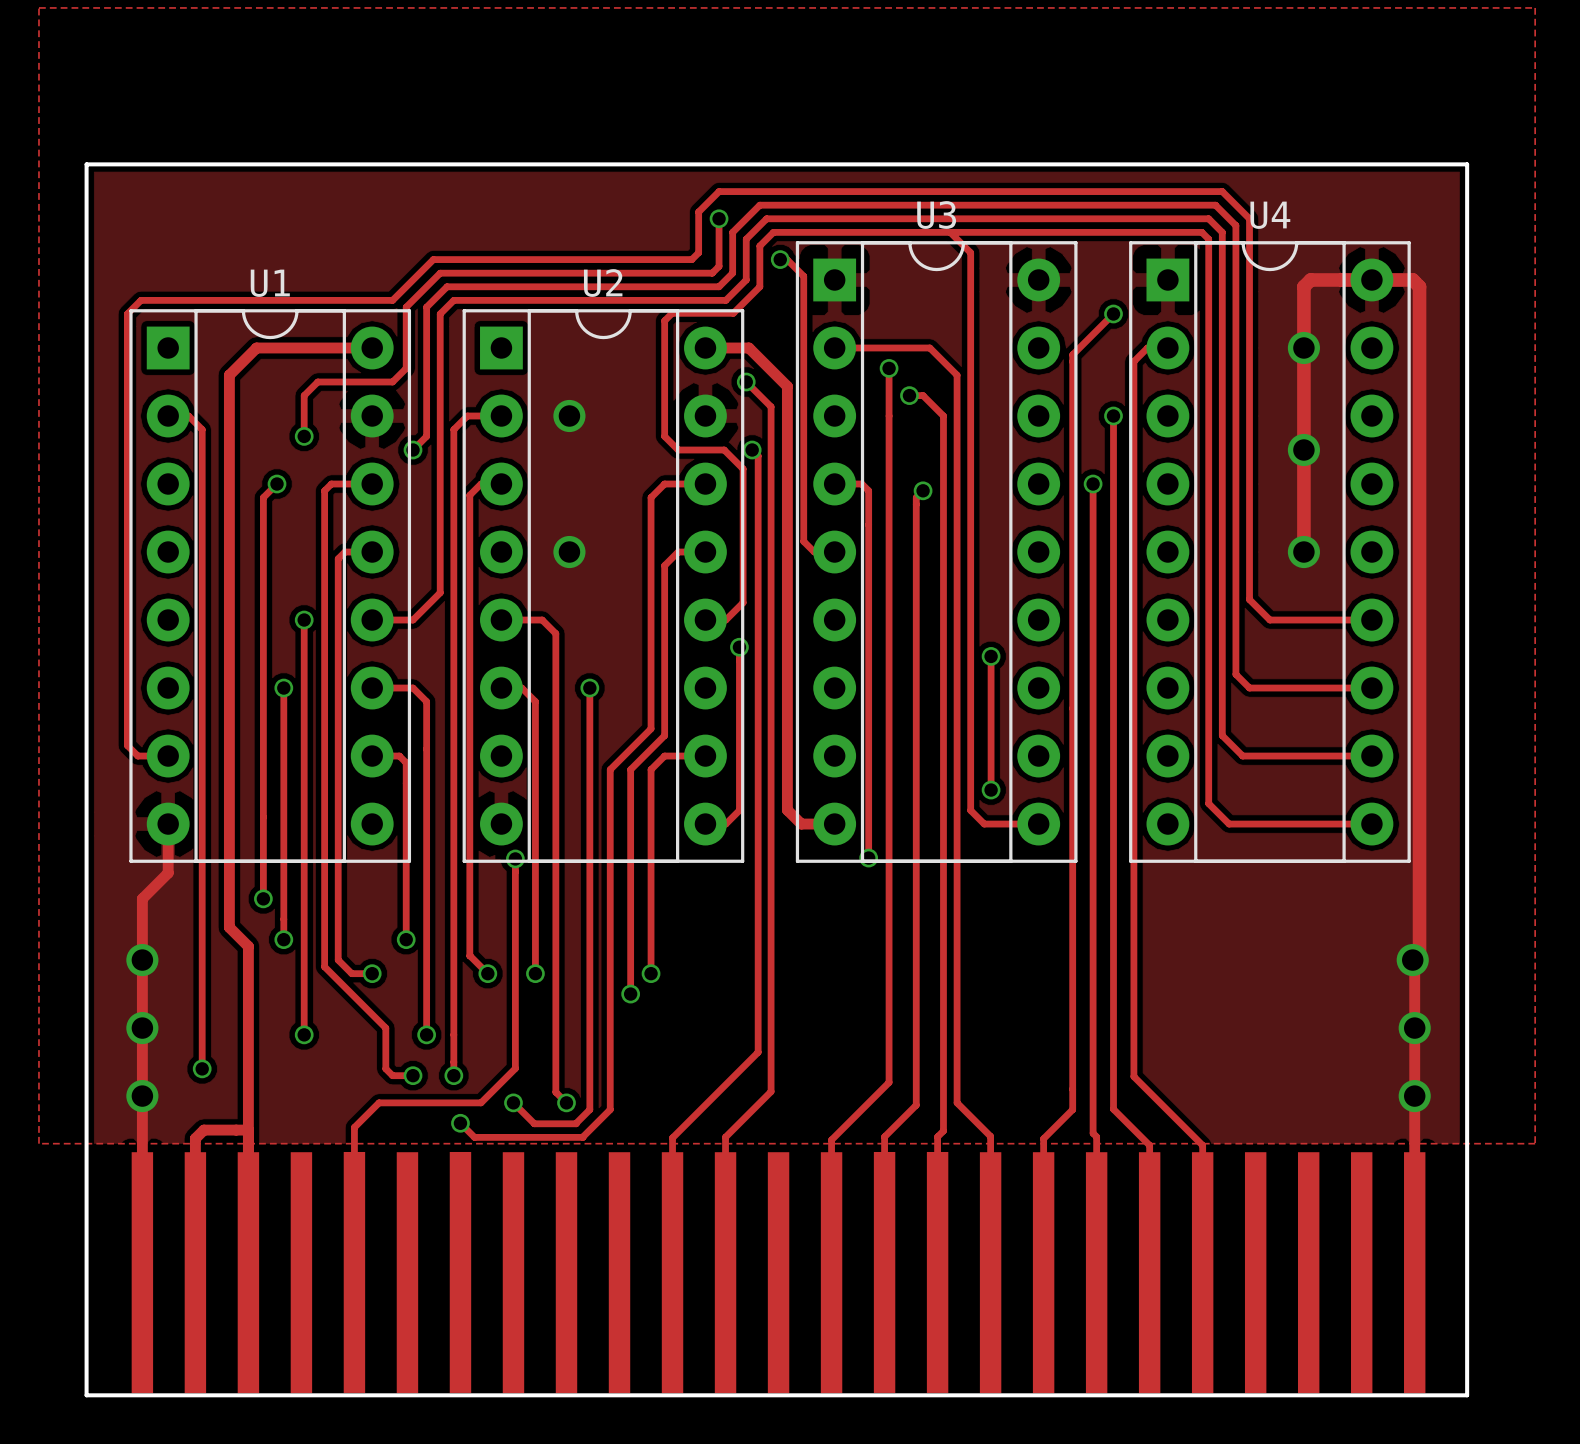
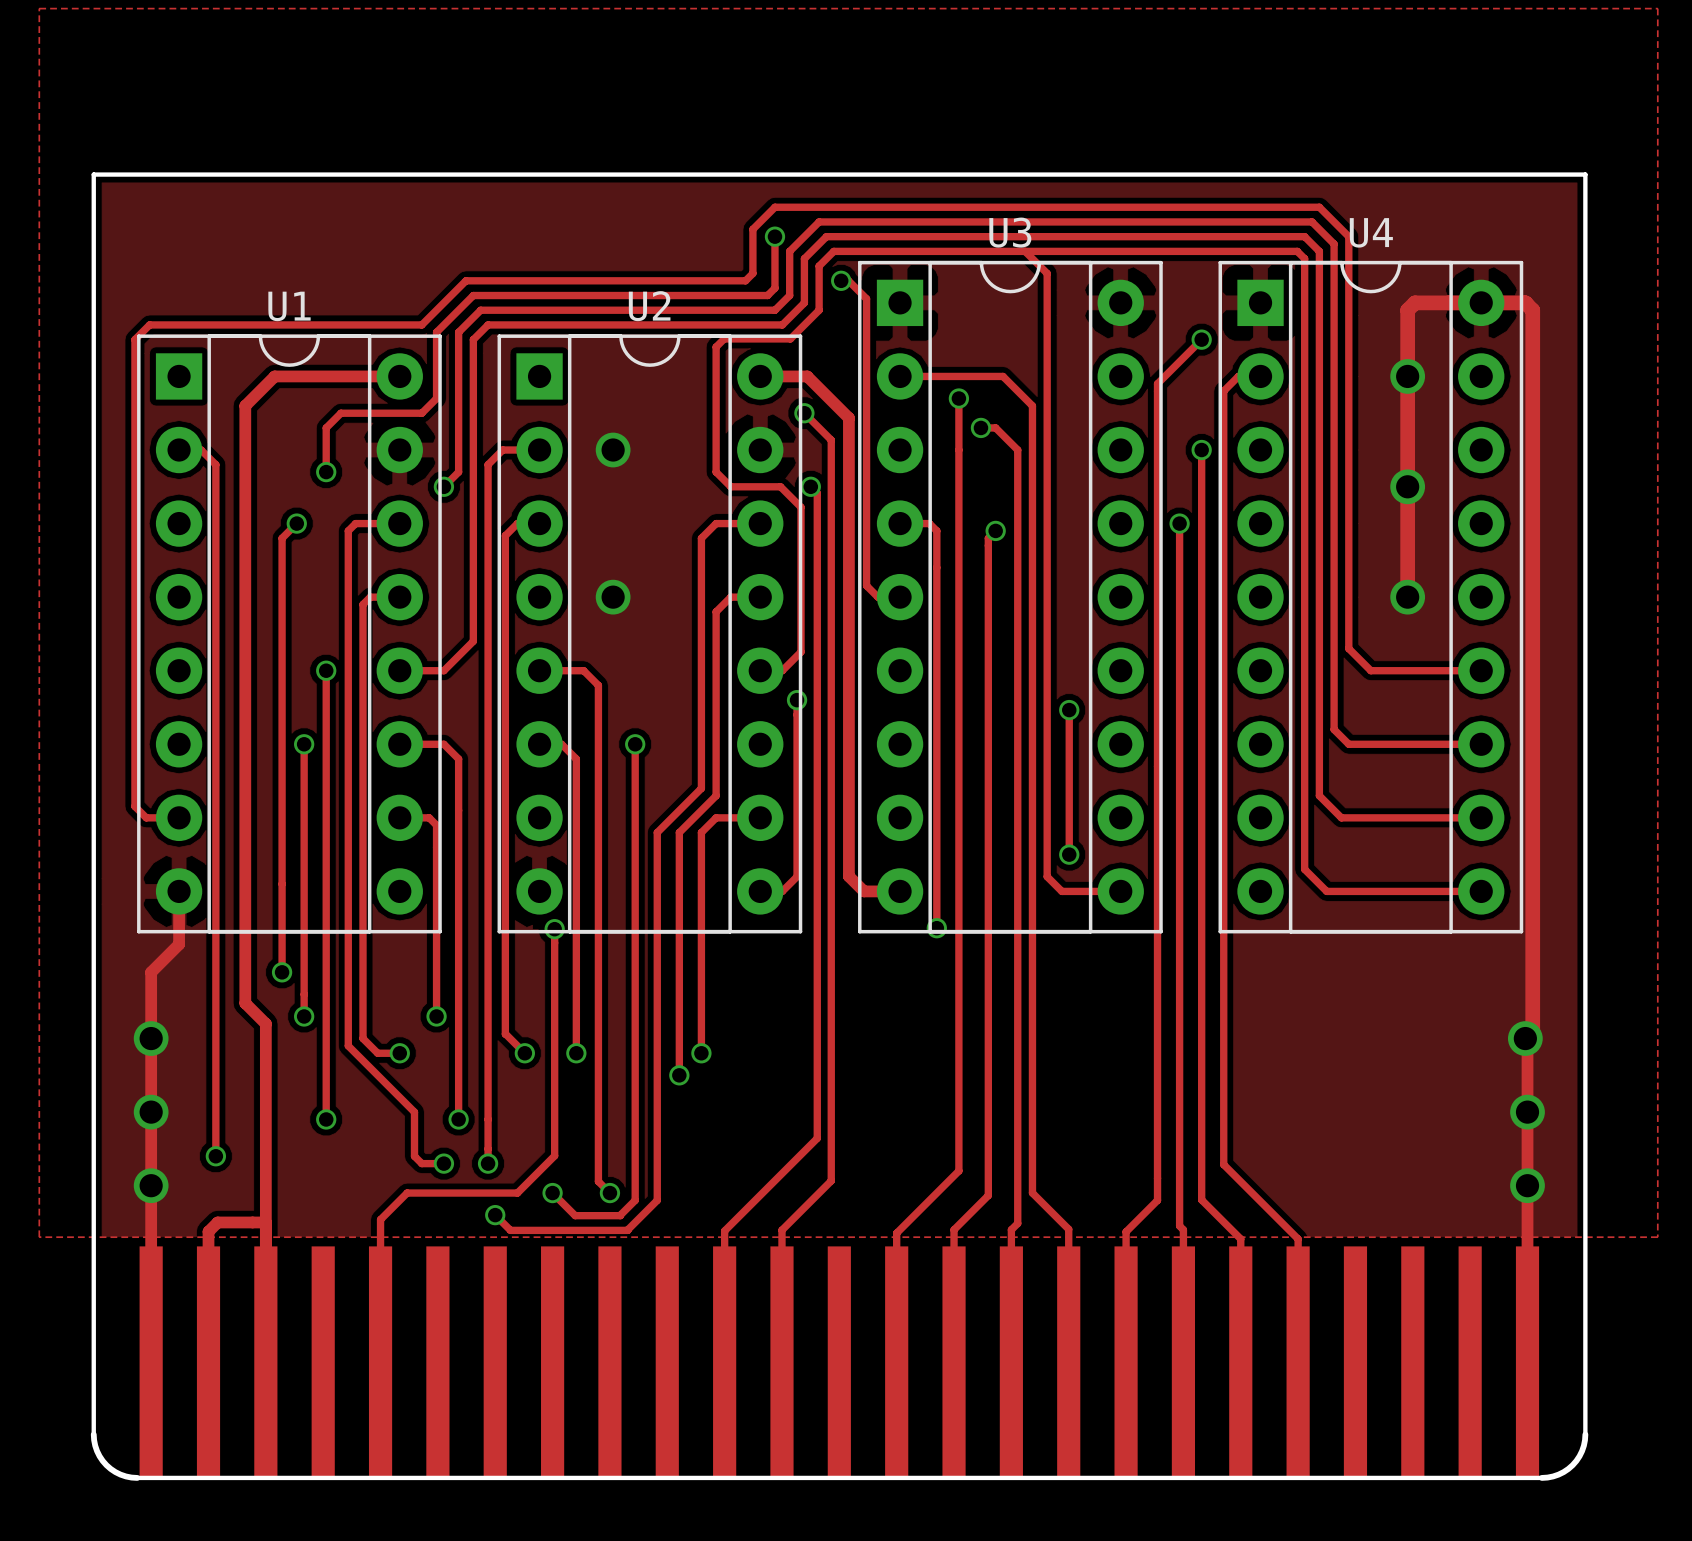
board edge: (86, 164) (1467, 164) (1467, 1395) (86, 1395) (86, 164) -> (93, 174) (93, 1434) (97, 1451) (110, 1468) (125, 1476) (137, 1477) (1541, 1477) (1558, 1474) (1576, 1460) (1583, 1445) (1585, 1434) (1585, 174) (93, 174)
part footprint: [131, 1151, 1426, 1394] -> [139, 1246, 1540, 1479]

